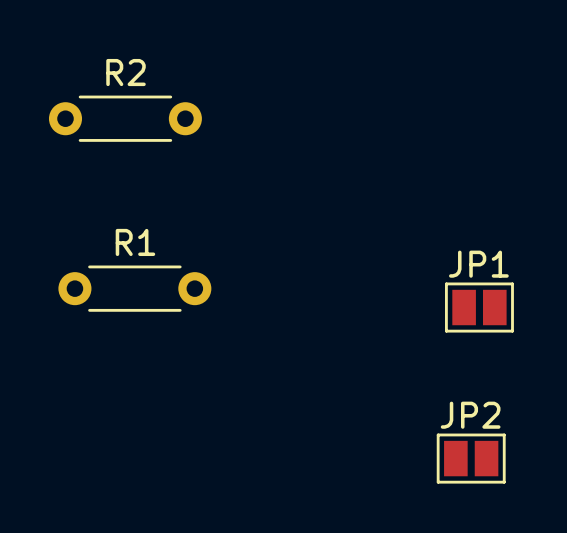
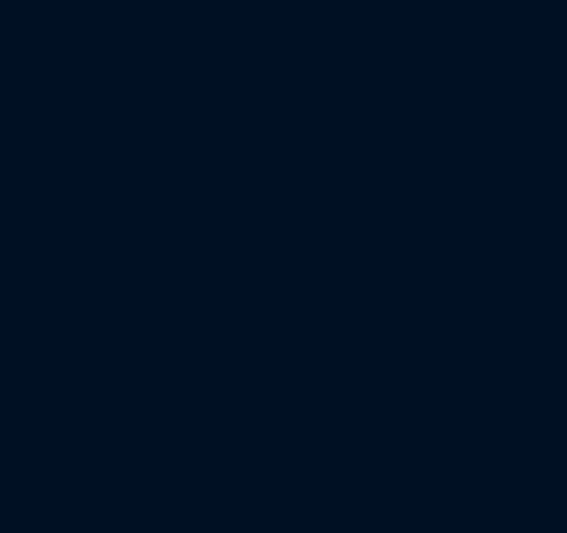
R2: (125, 118) -> none
R1: (134, 288) -> none
JP1: (479, 307) -> none
JP2: (471, 458) -> none

